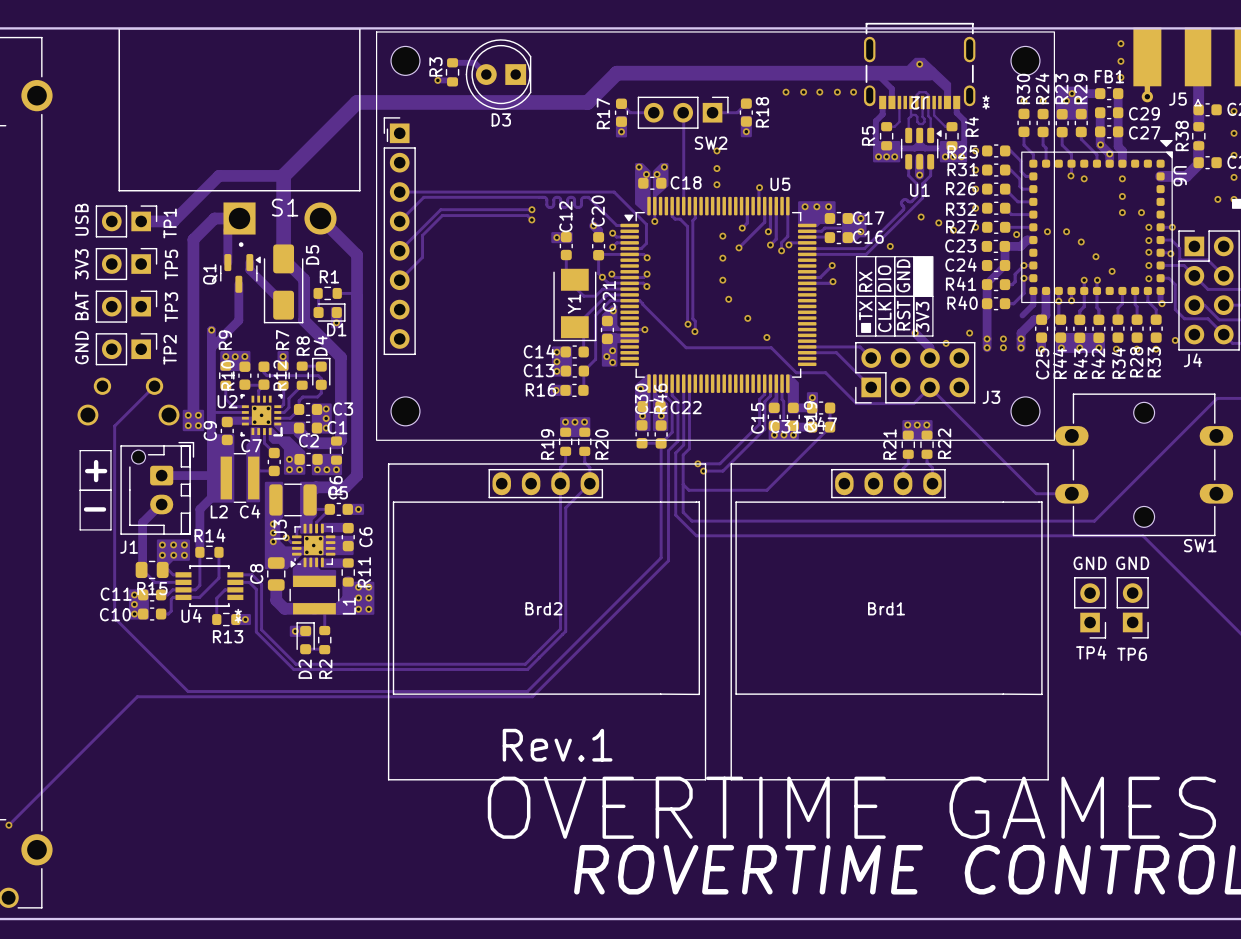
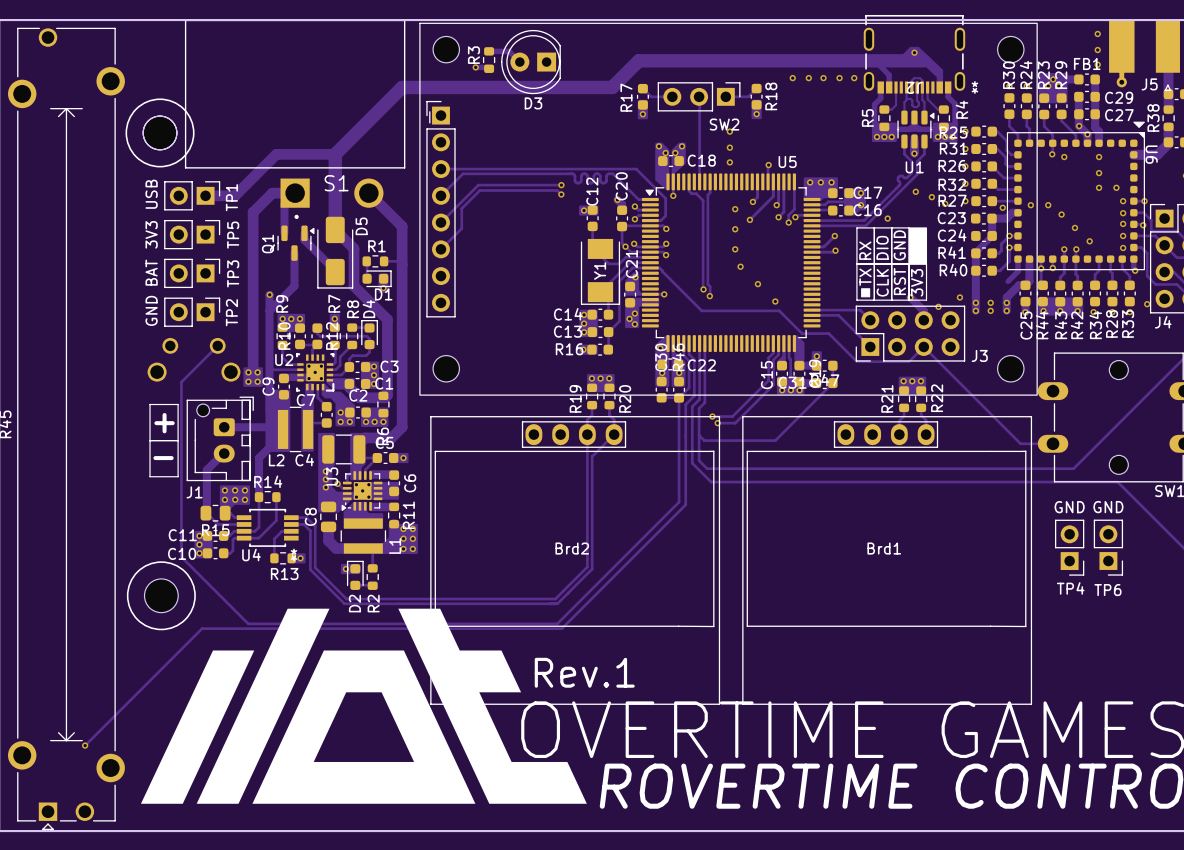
part: none -> (160, 132)
part: none -> (160, 132)
part: none -> (161, 595)
drawing: none -> [140, 608, 587, 804]

